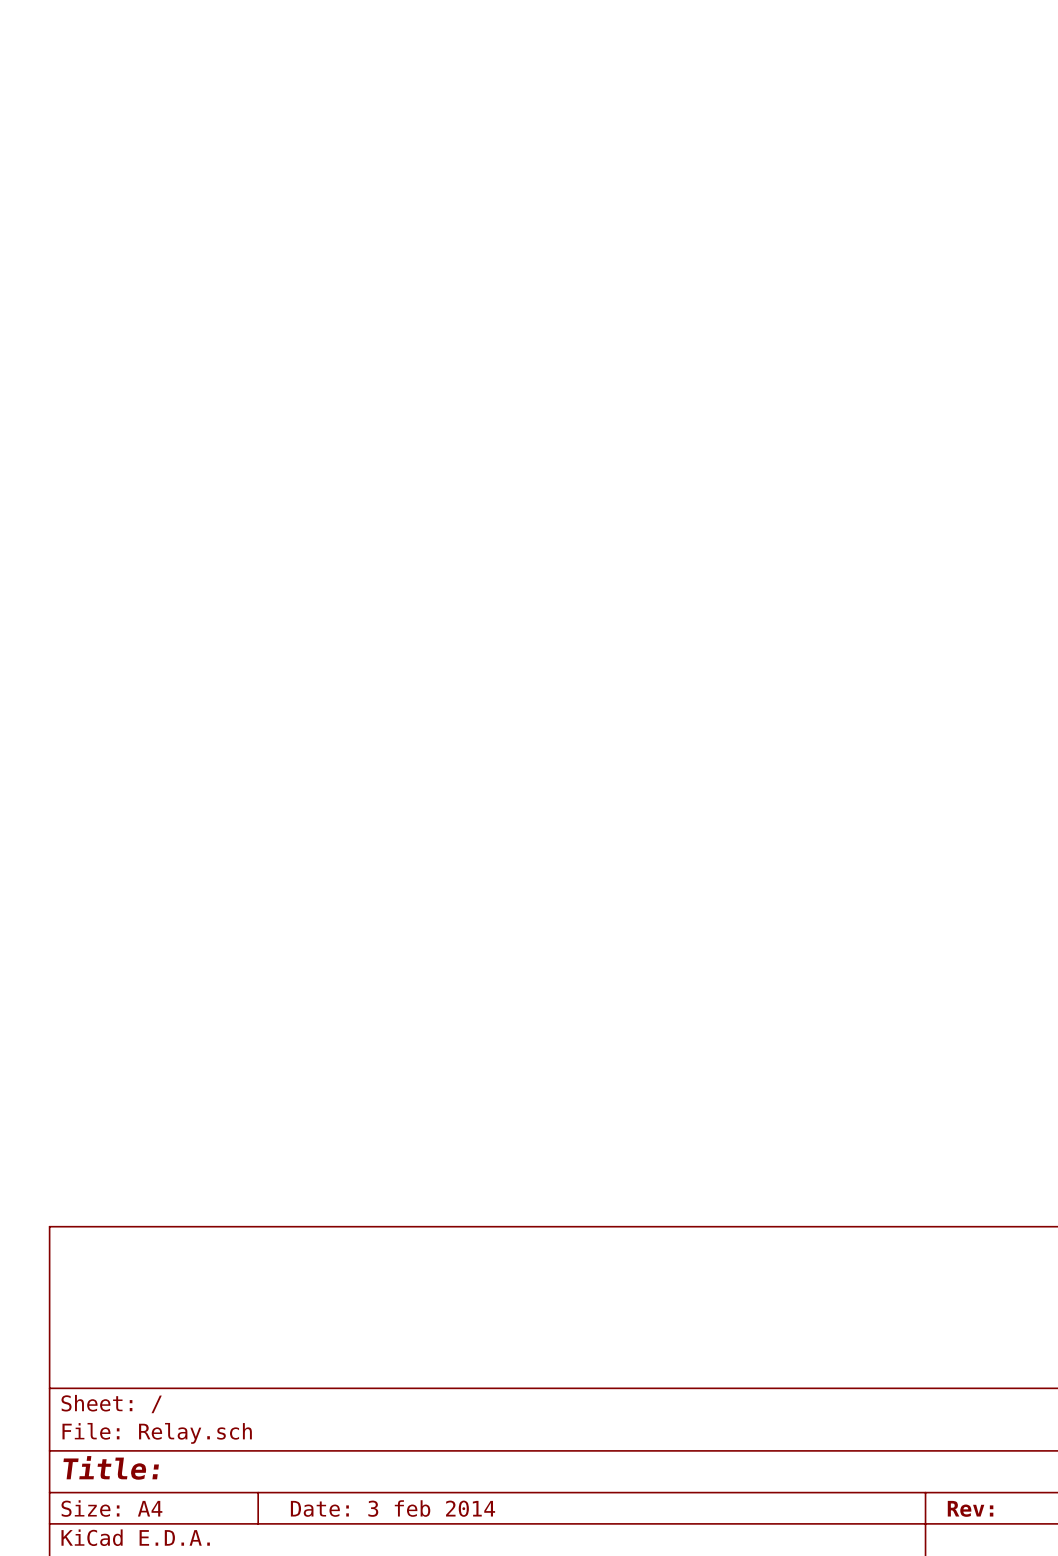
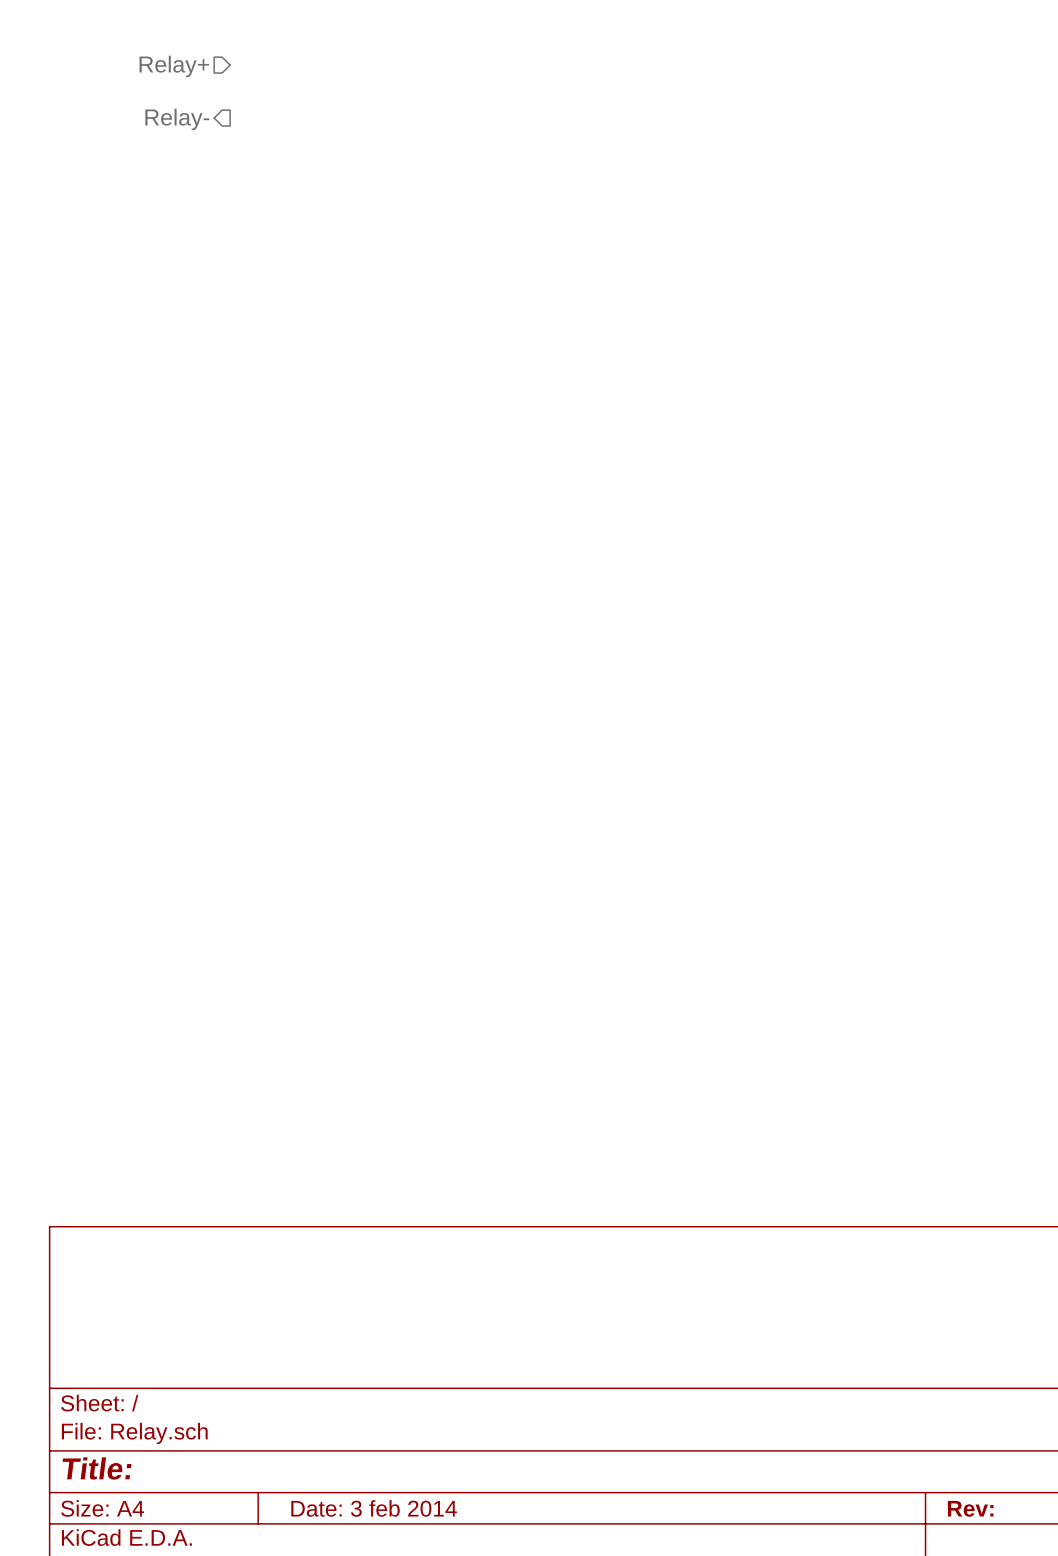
hierarchical label: none -> Relay+ (174, 66)
hierarchical label: none -> Relay- (177, 119)

